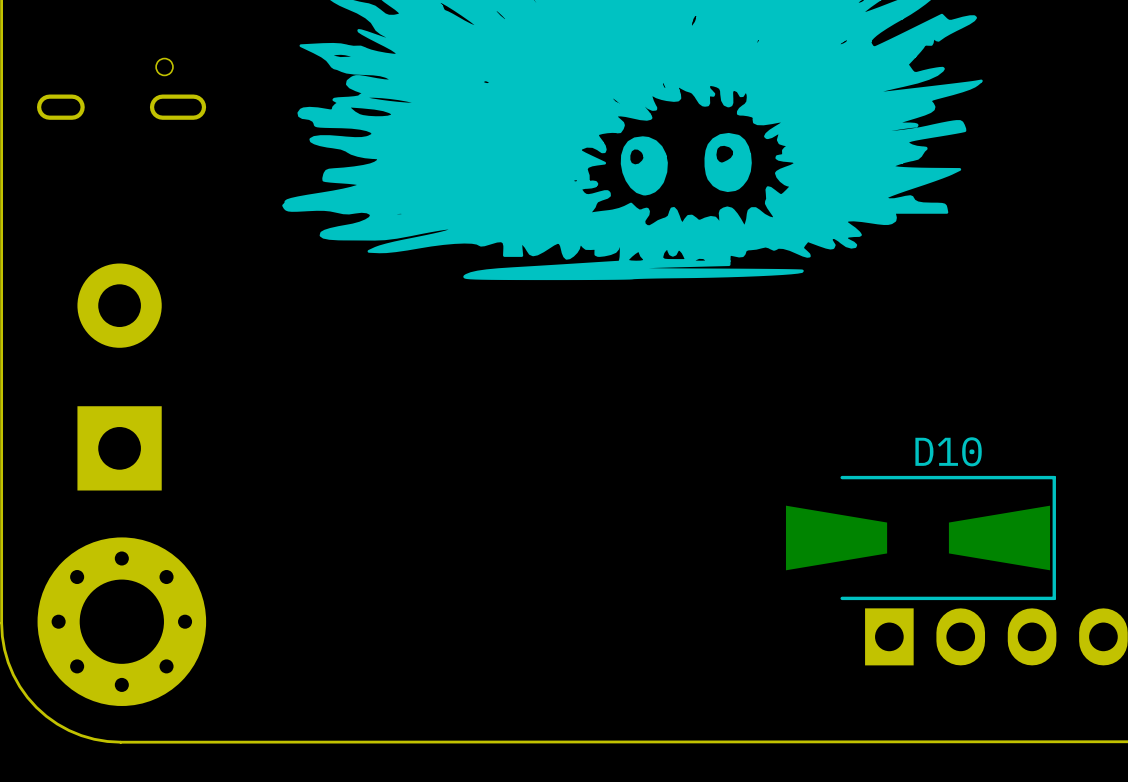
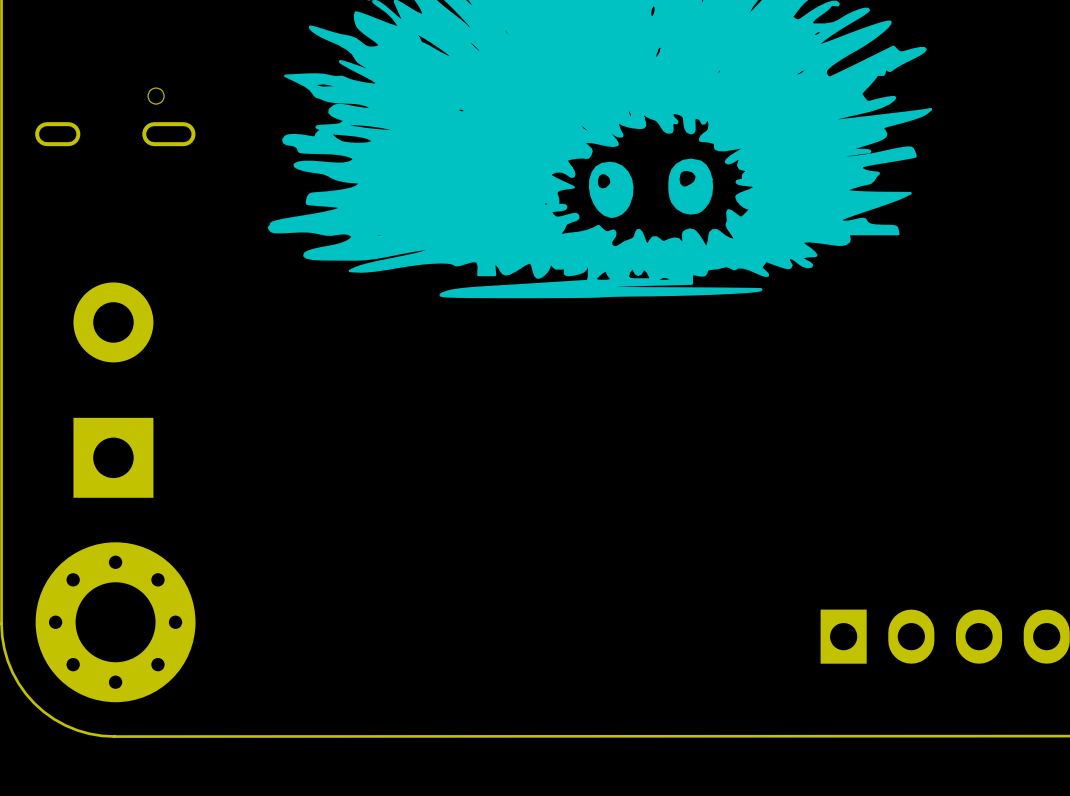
D10: (920, 537) -> none

